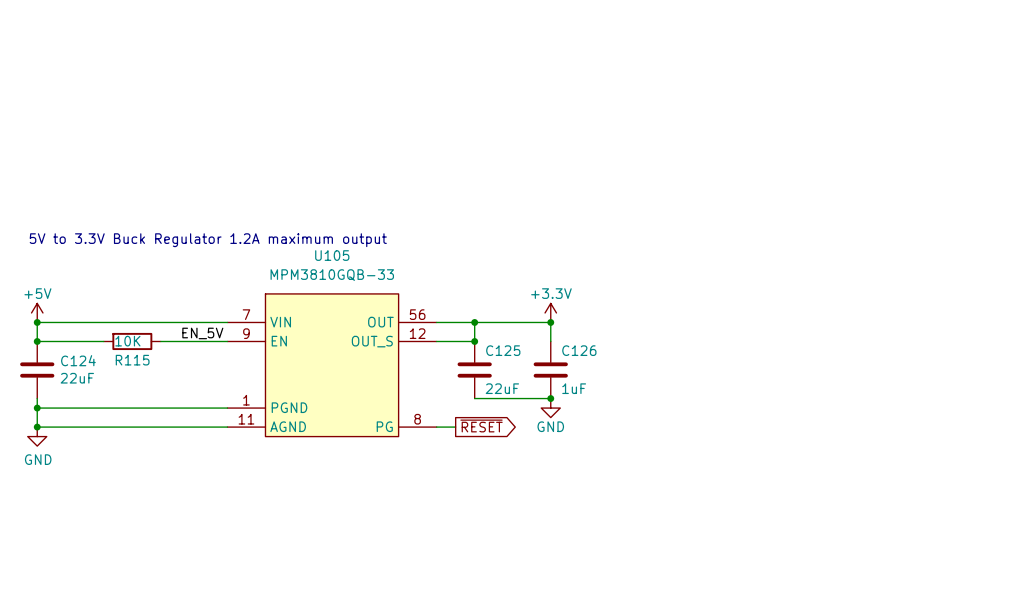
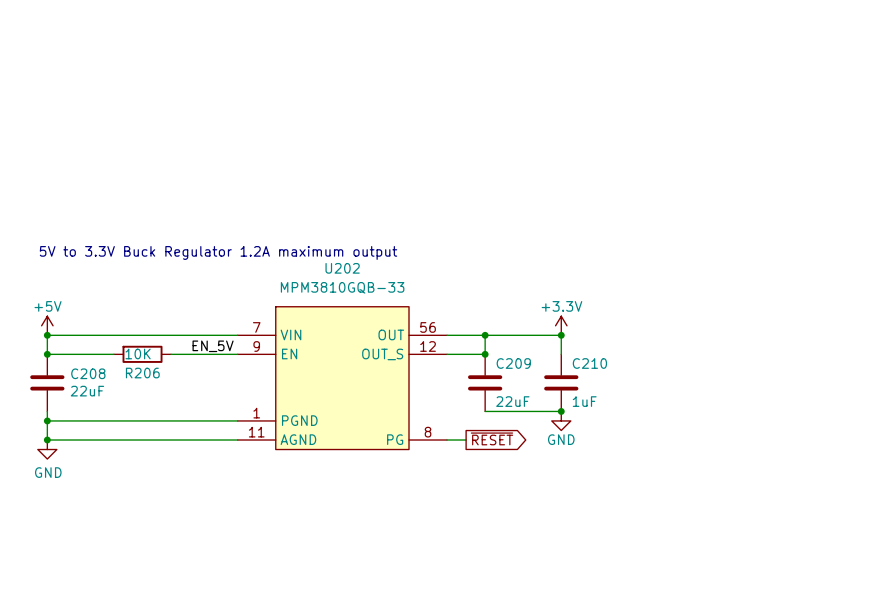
U105 name: U105 (332, 255) -> U202 (342, 268)
C125 name: C125 (503, 350) -> C209 (513, 363)
C126 name: C126 (579, 350) -> C210 (589, 363)
C124 name: C124 (78, 360) -> C208 (88, 373)
R115 name: R115 (132, 360) -> R206 (142, 373)

